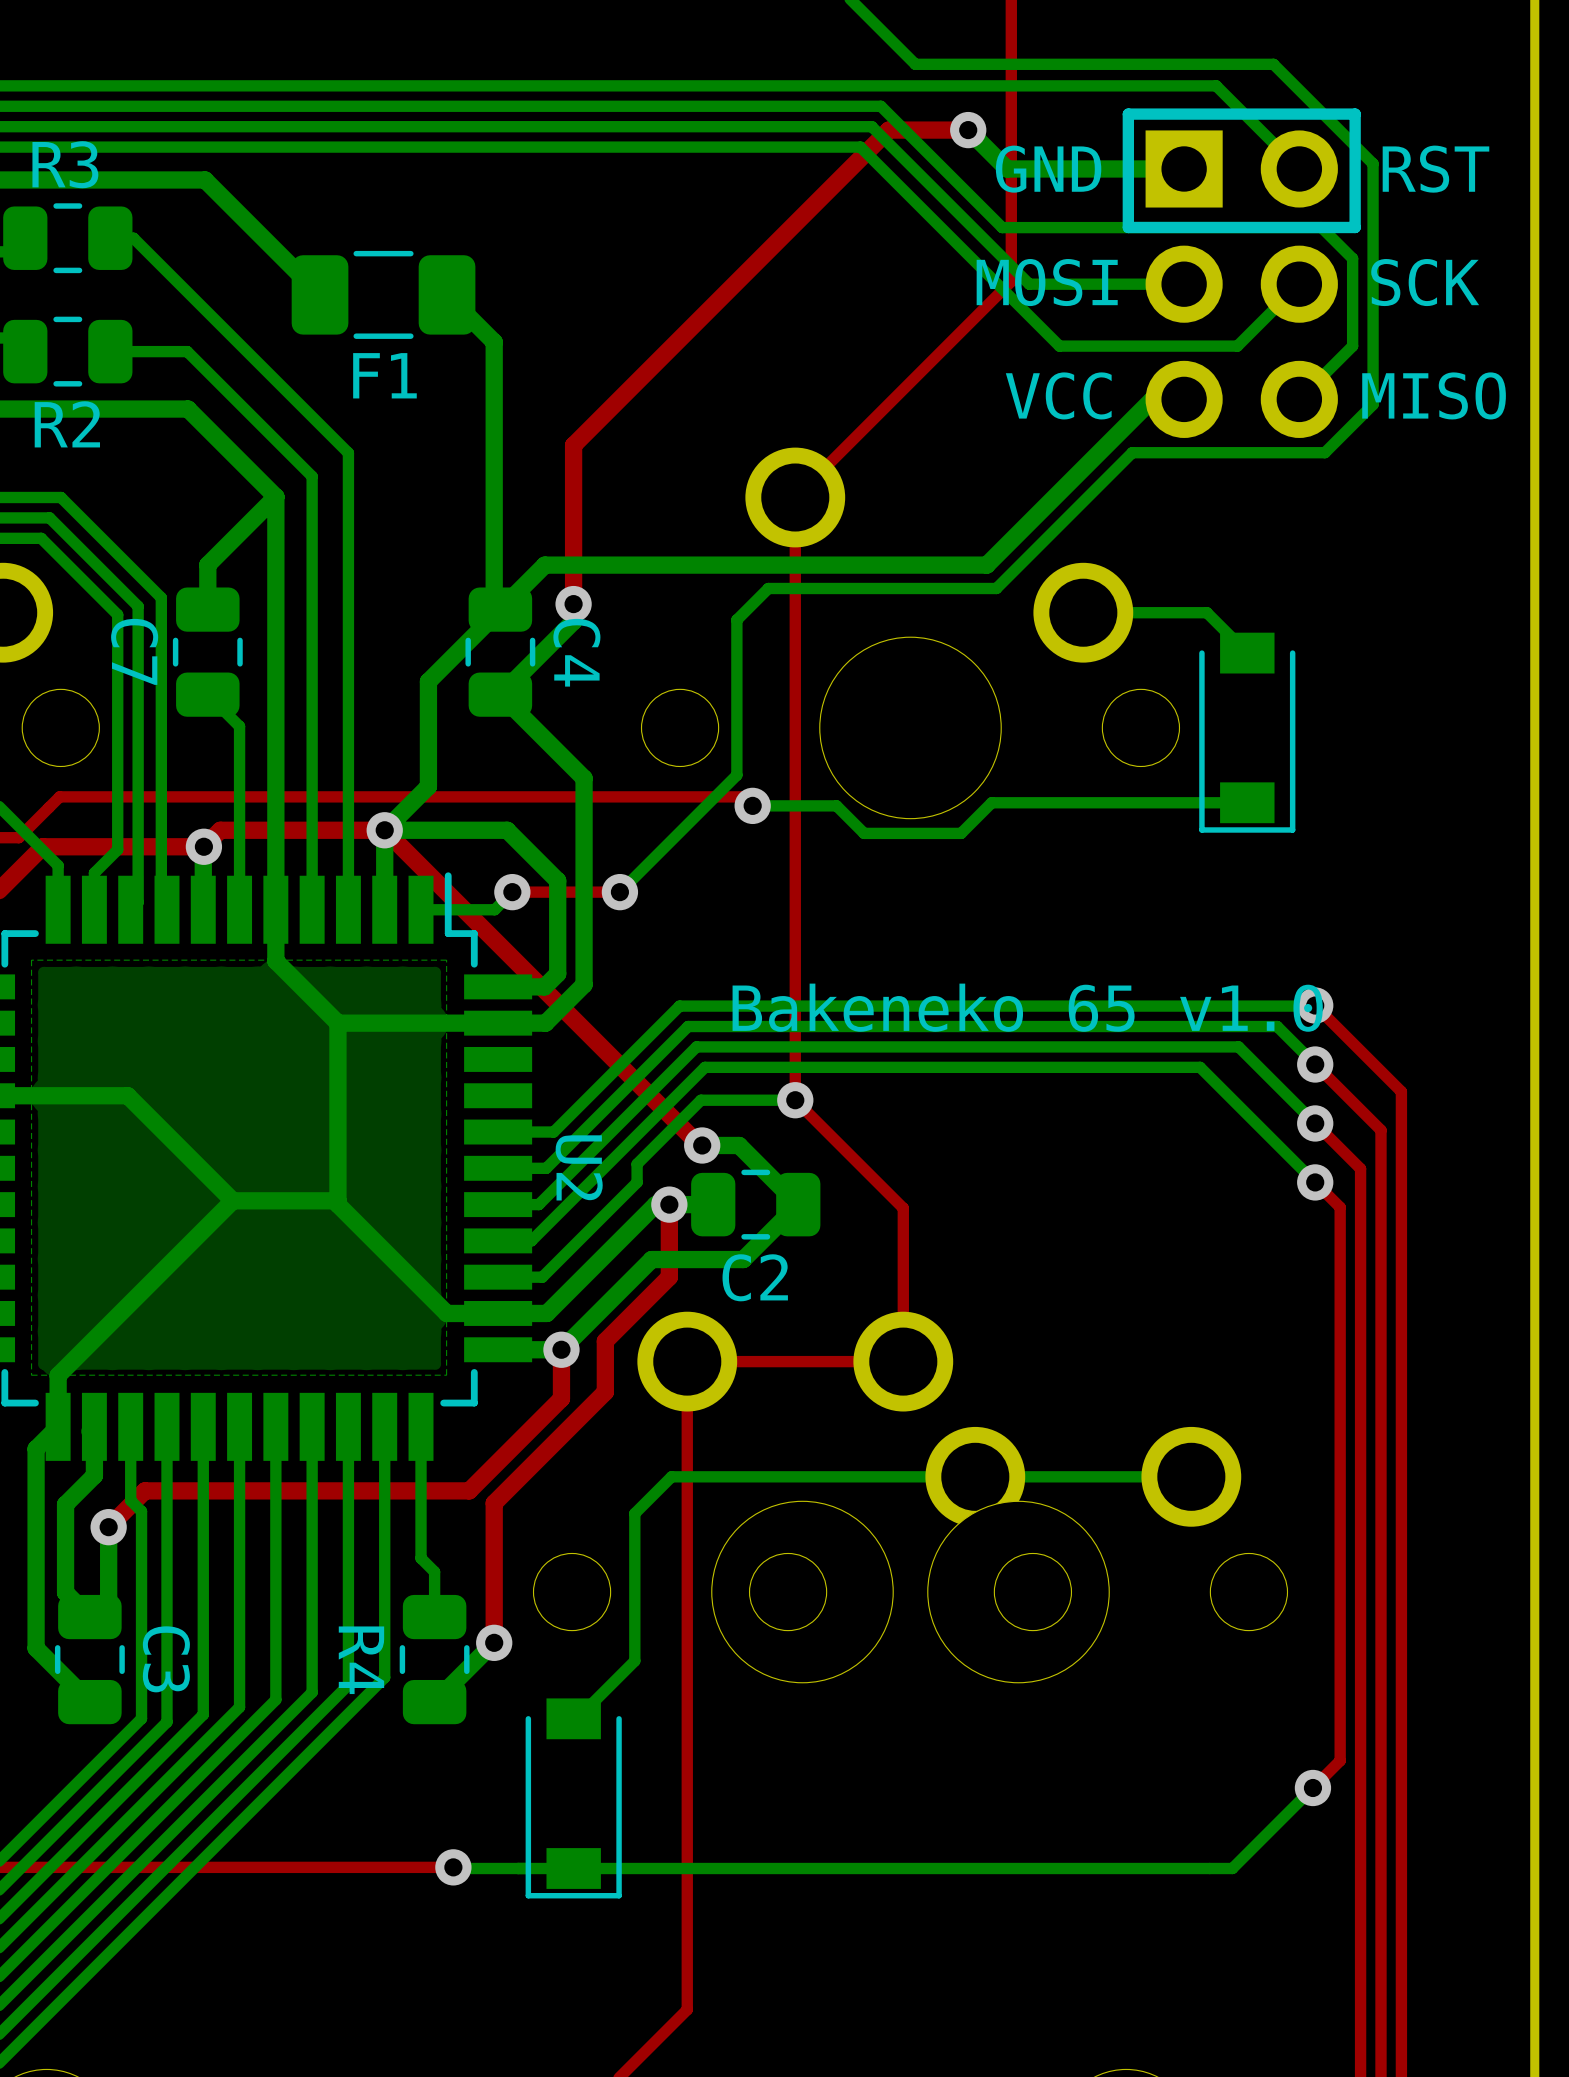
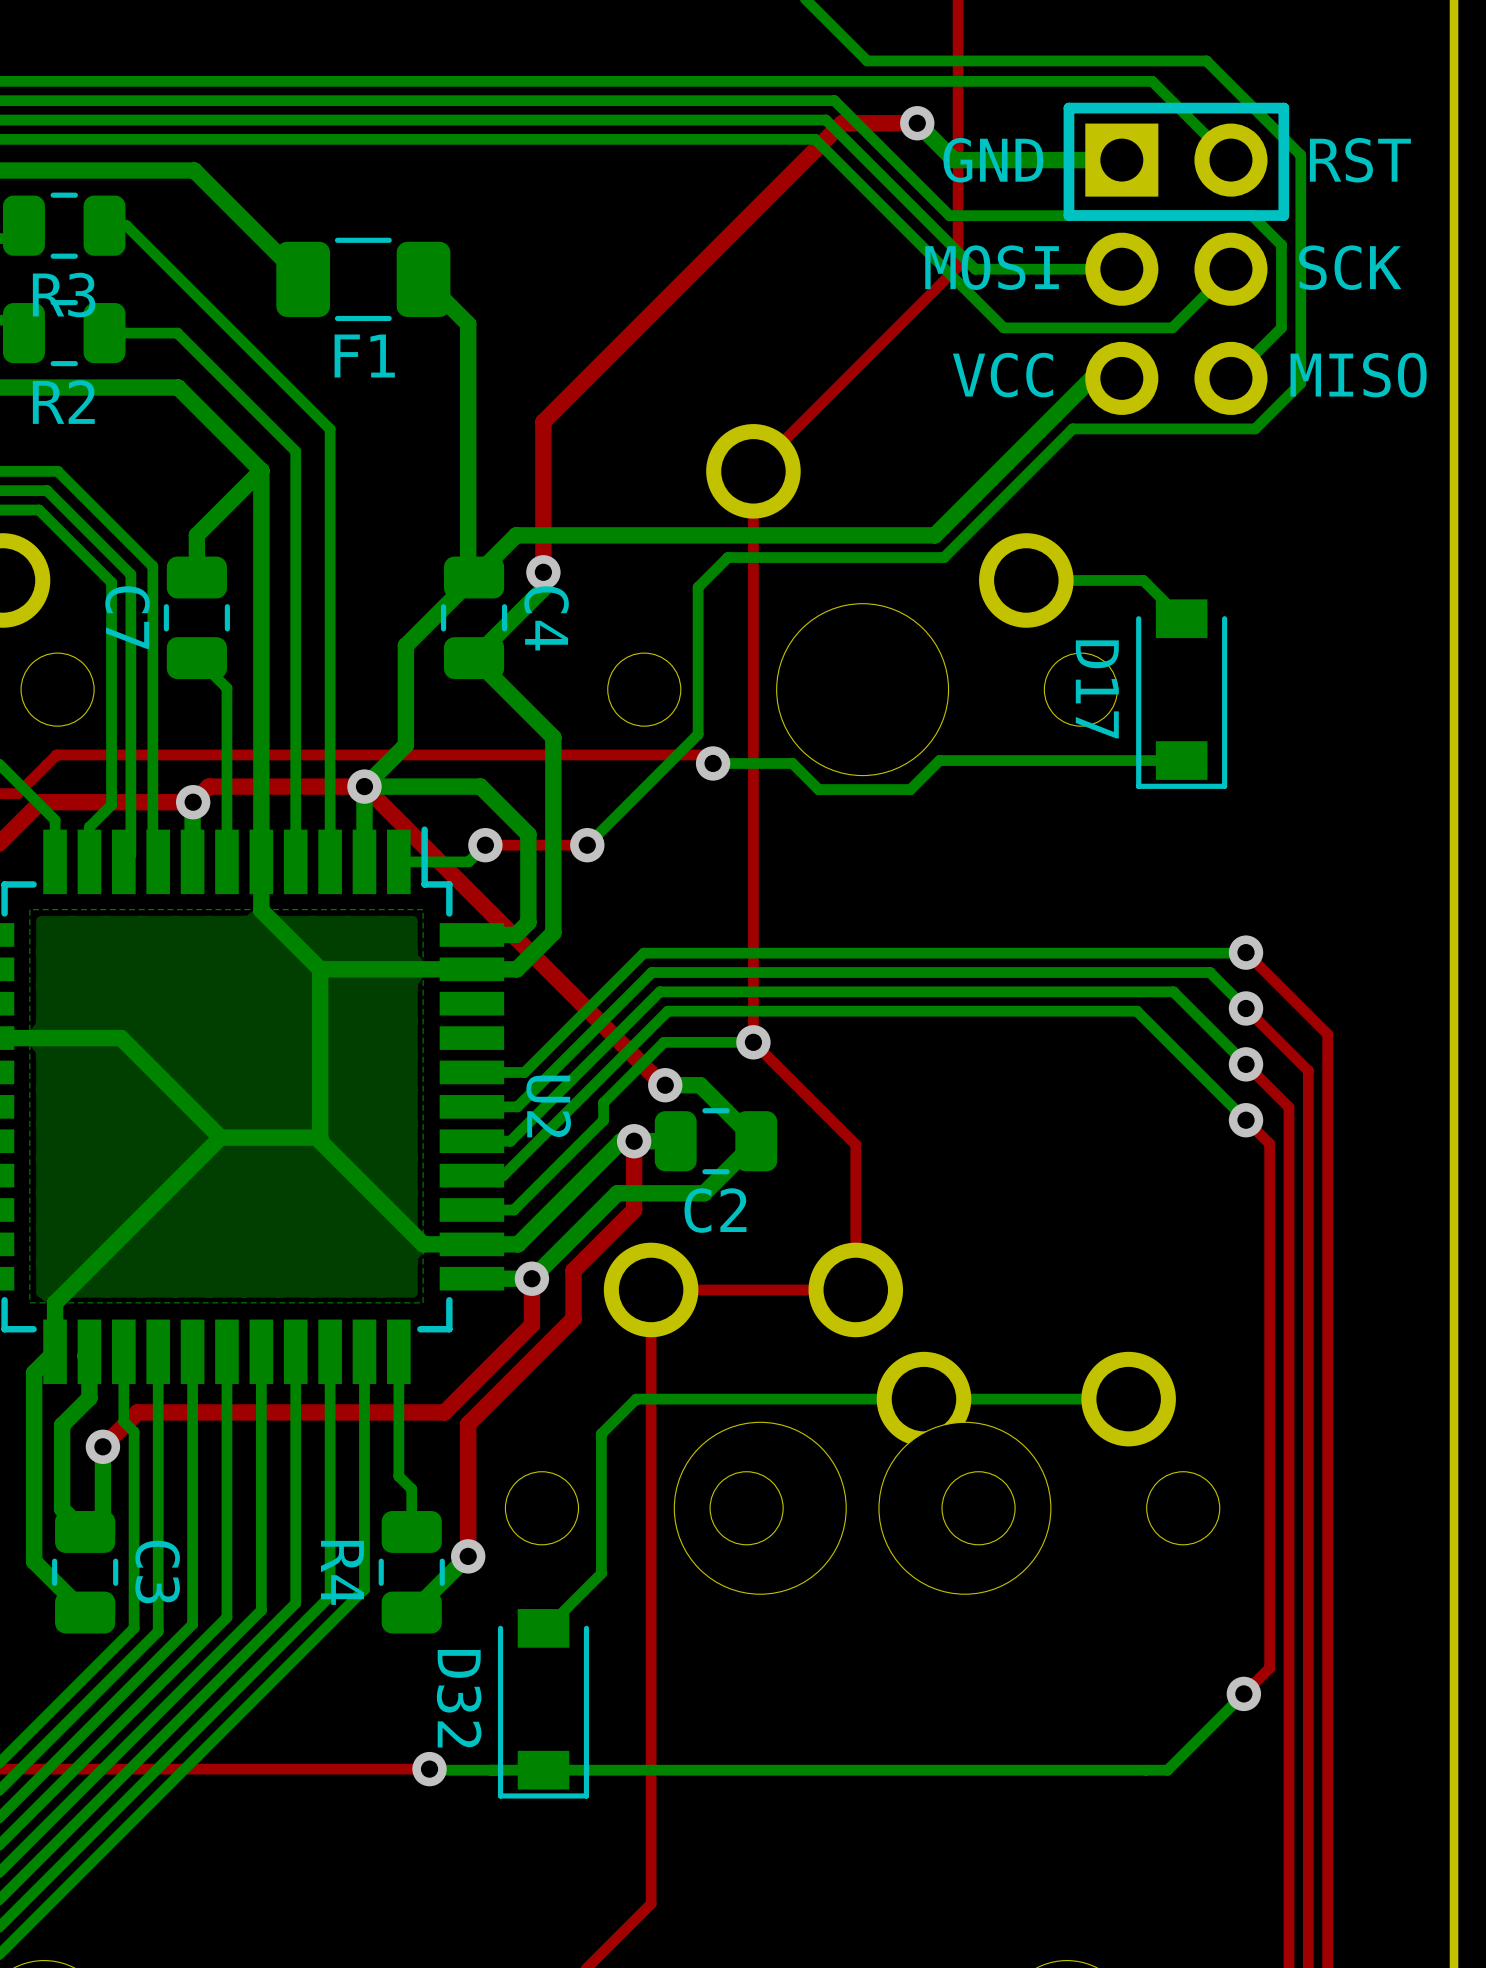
R3 name position: R3 (65, 164) -> R3 (64, 295)
D17 name: none -> D17 (1097, 689)
text: Bakeneko 65 v1.0 (1027, 1007) -> none
D32 name: none -> D32 (459, 1698)

